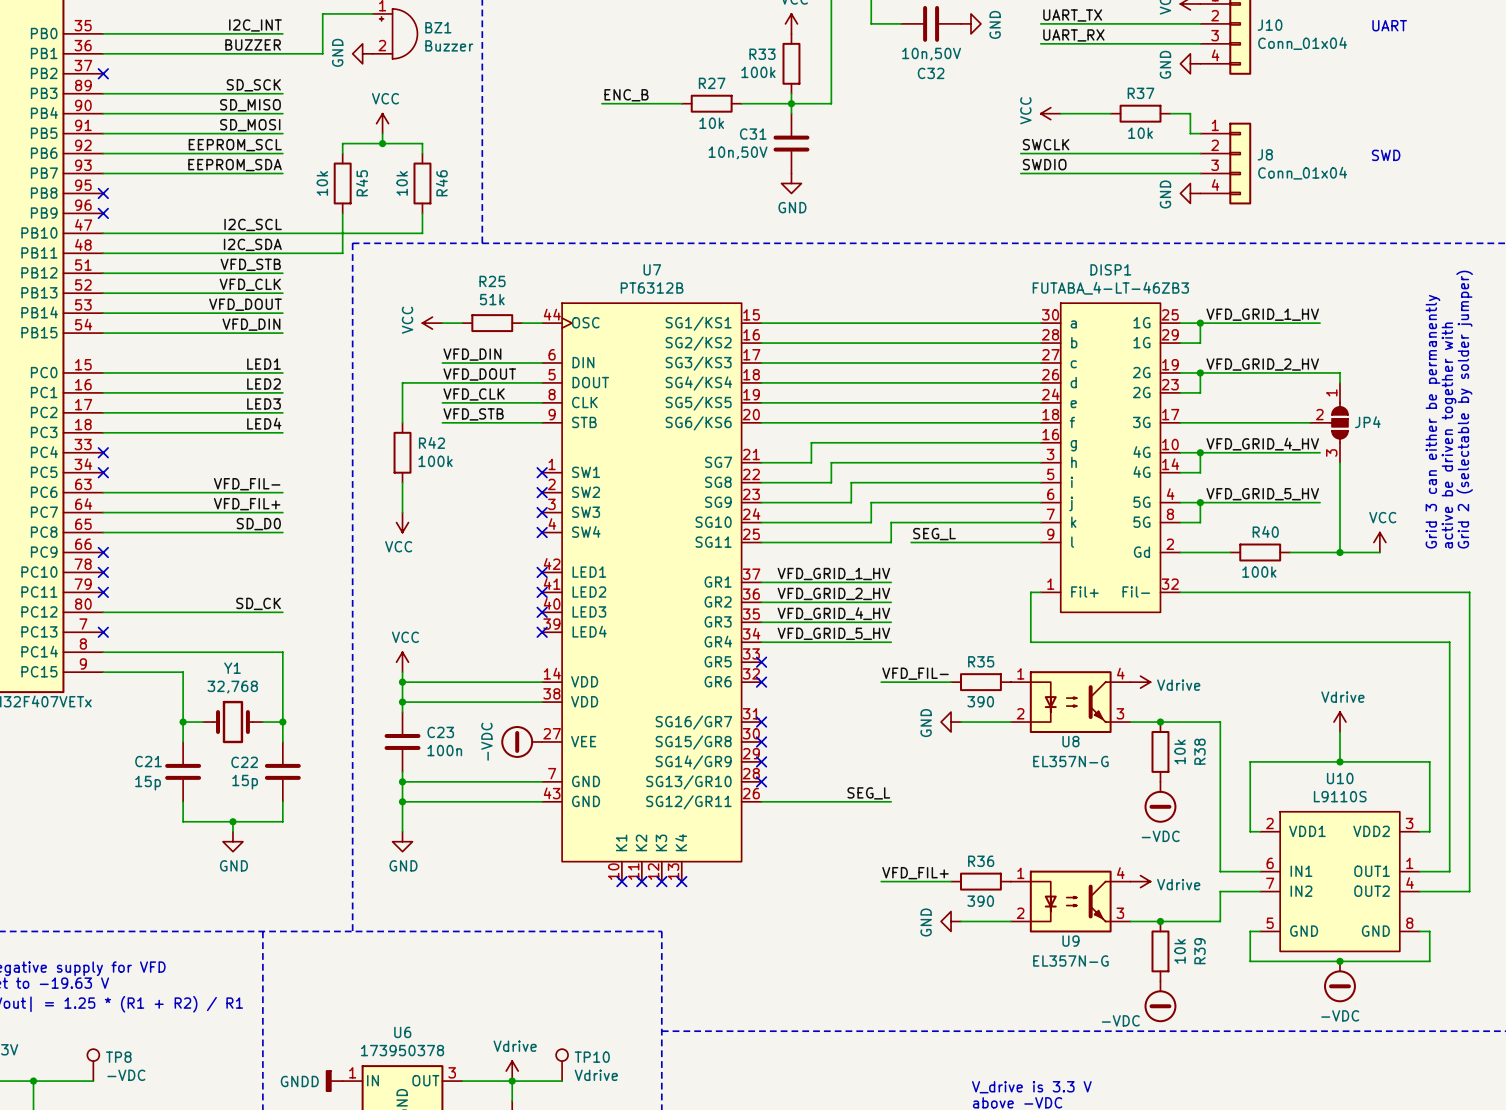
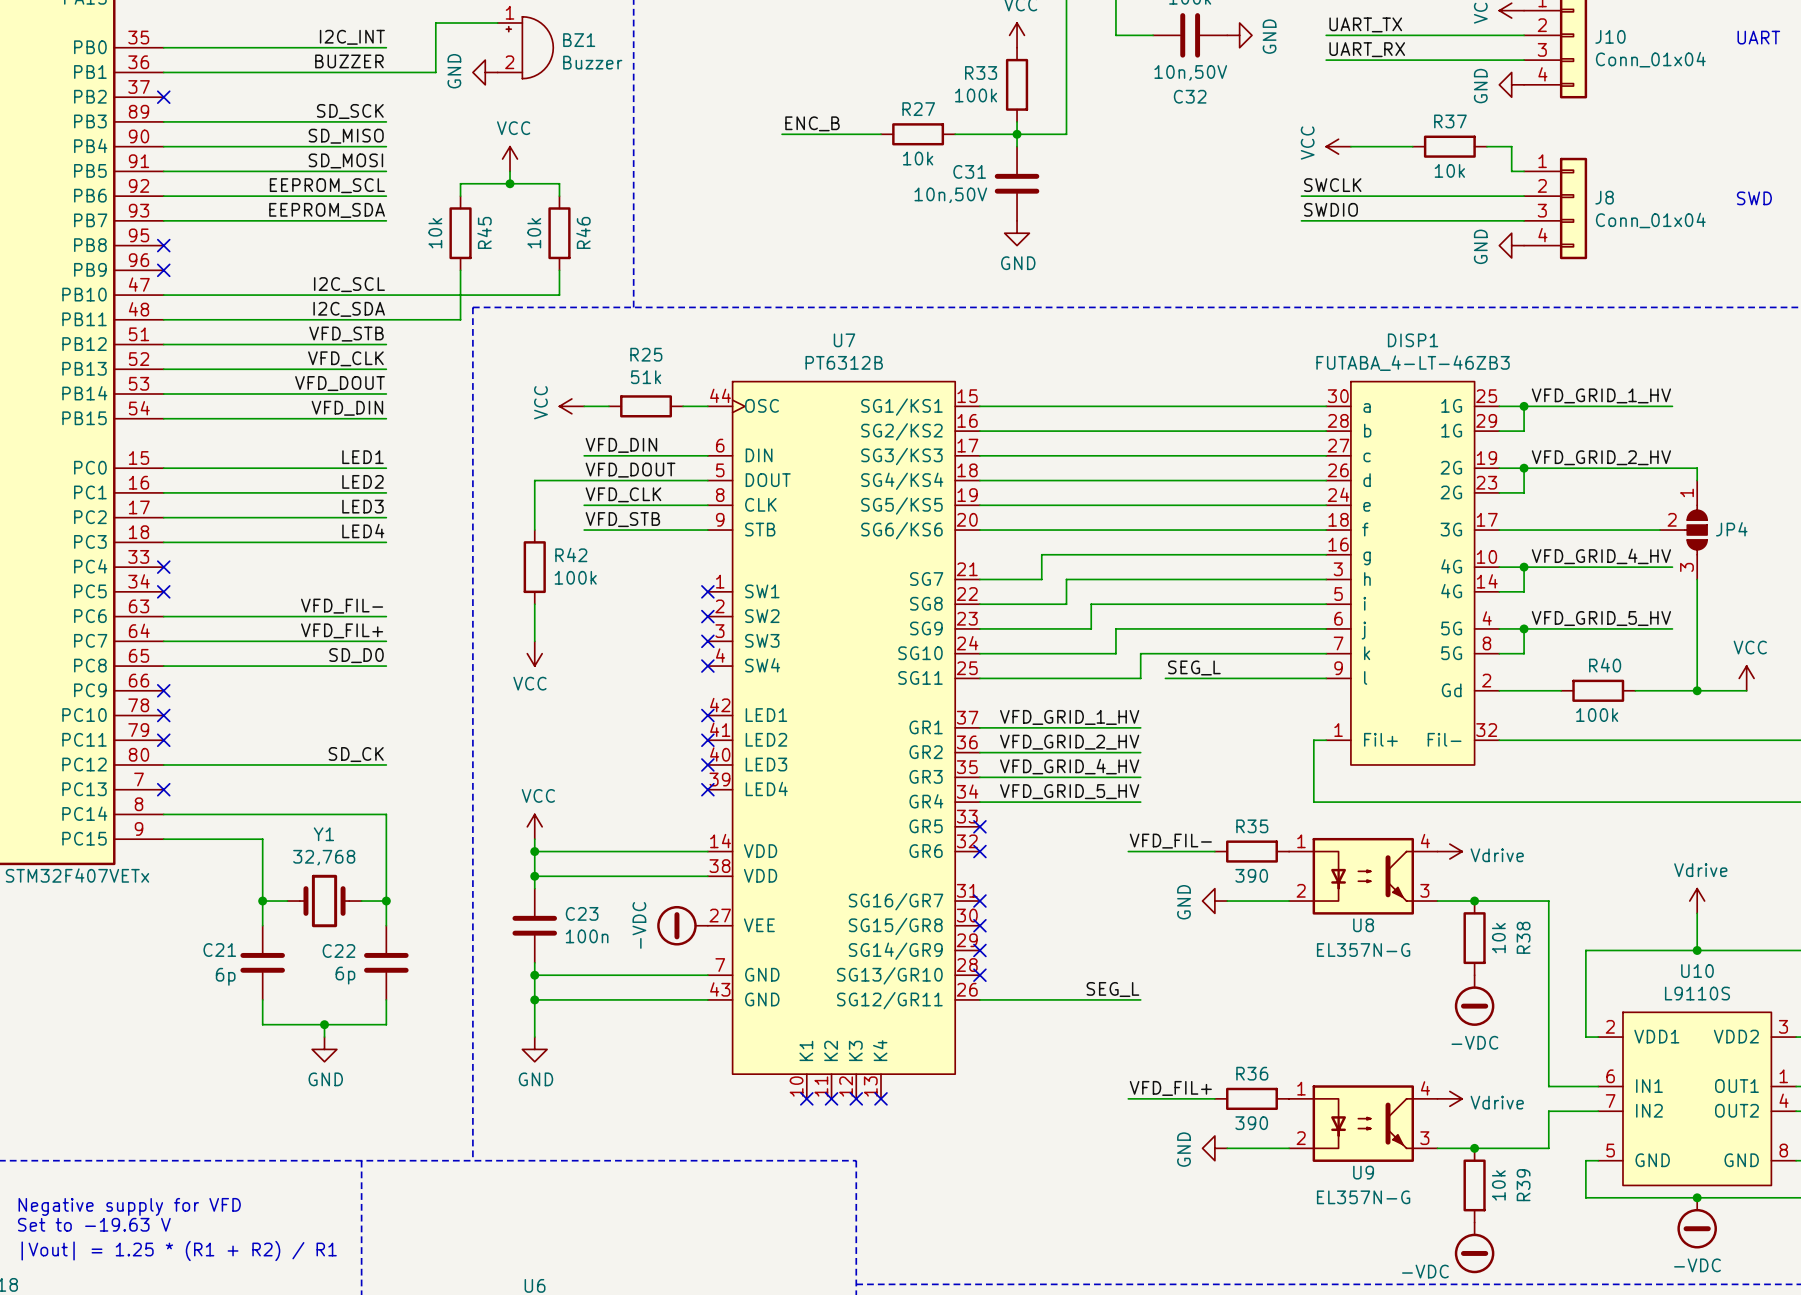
C22 value: 15p (245, 782) -> 6p (345, 975)
C21 value: 15p (148, 783) -> 6p (225, 976)

